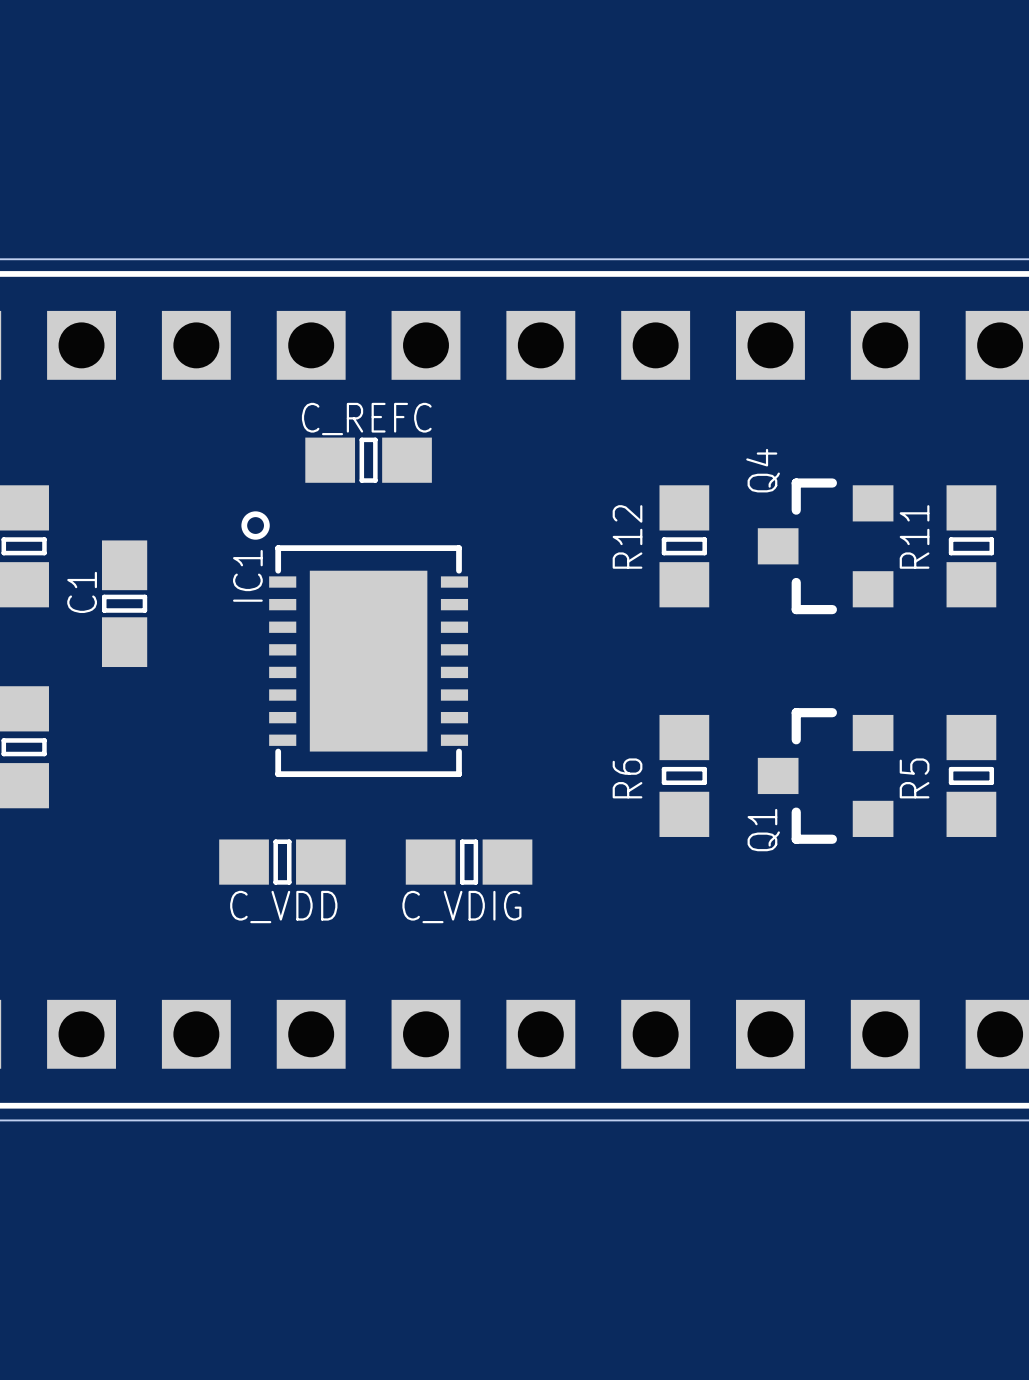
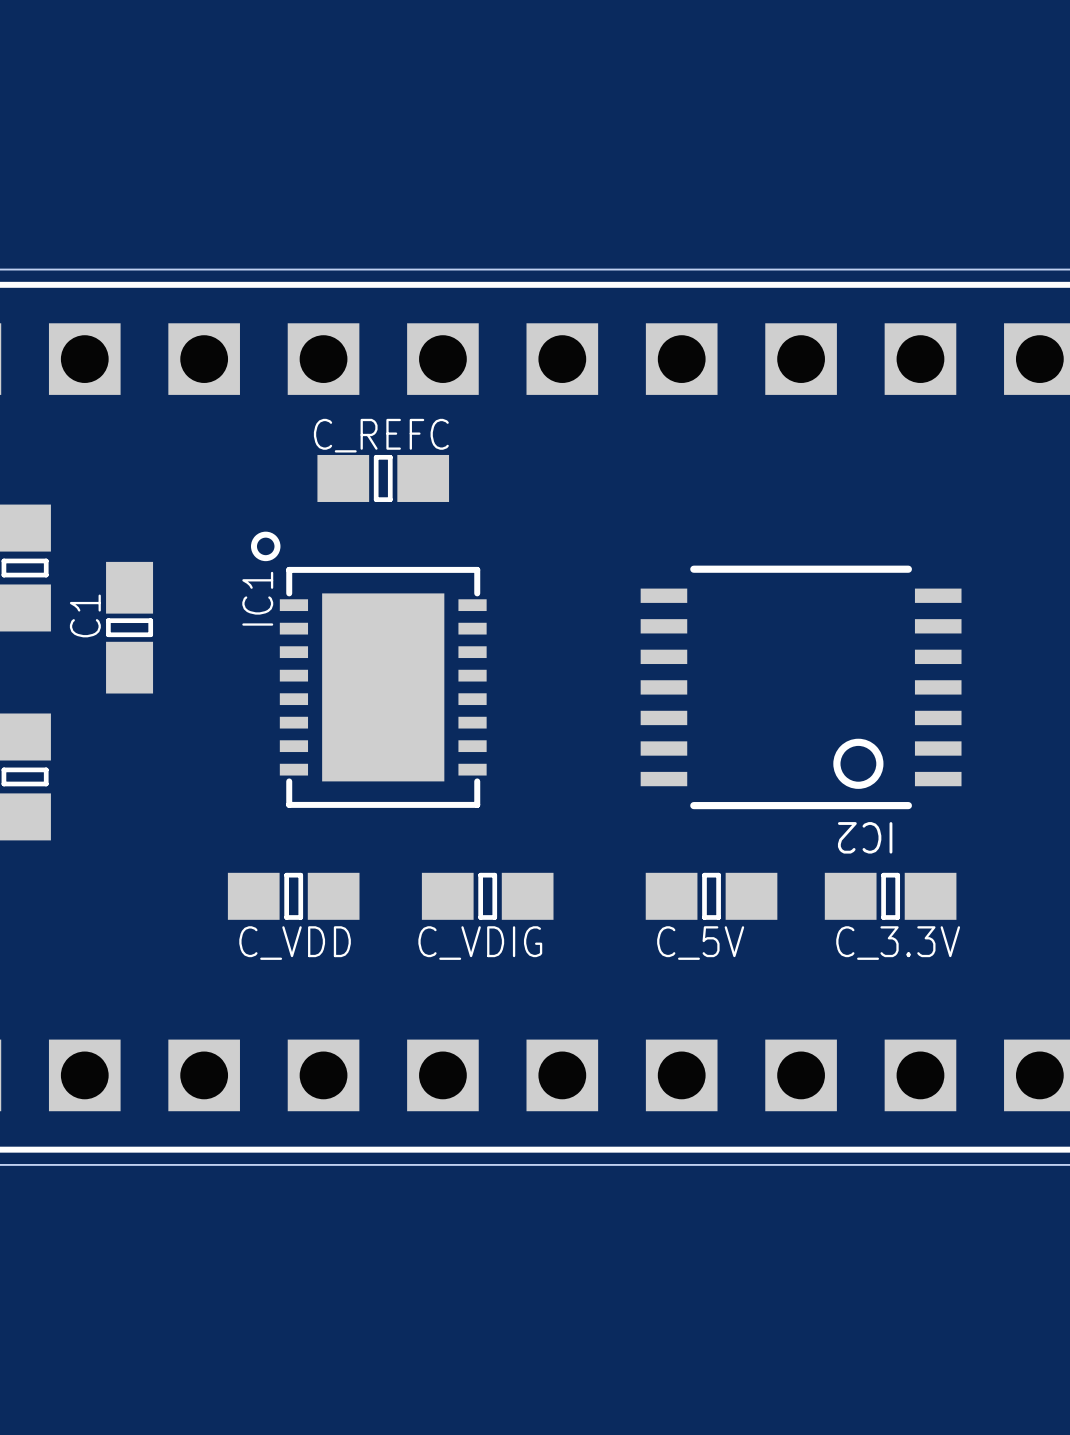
R12: (684, 546) -> none
Q4: (825, 546) -> none
R11: (971, 546) -> none
IC2: none -> (801, 687)
R6: (684, 775) -> none
Q1: (825, 775) -> none
R5: (971, 775) -> none
C_5V: none -> (711, 896)
C_3.3V: none -> (890, 896)

